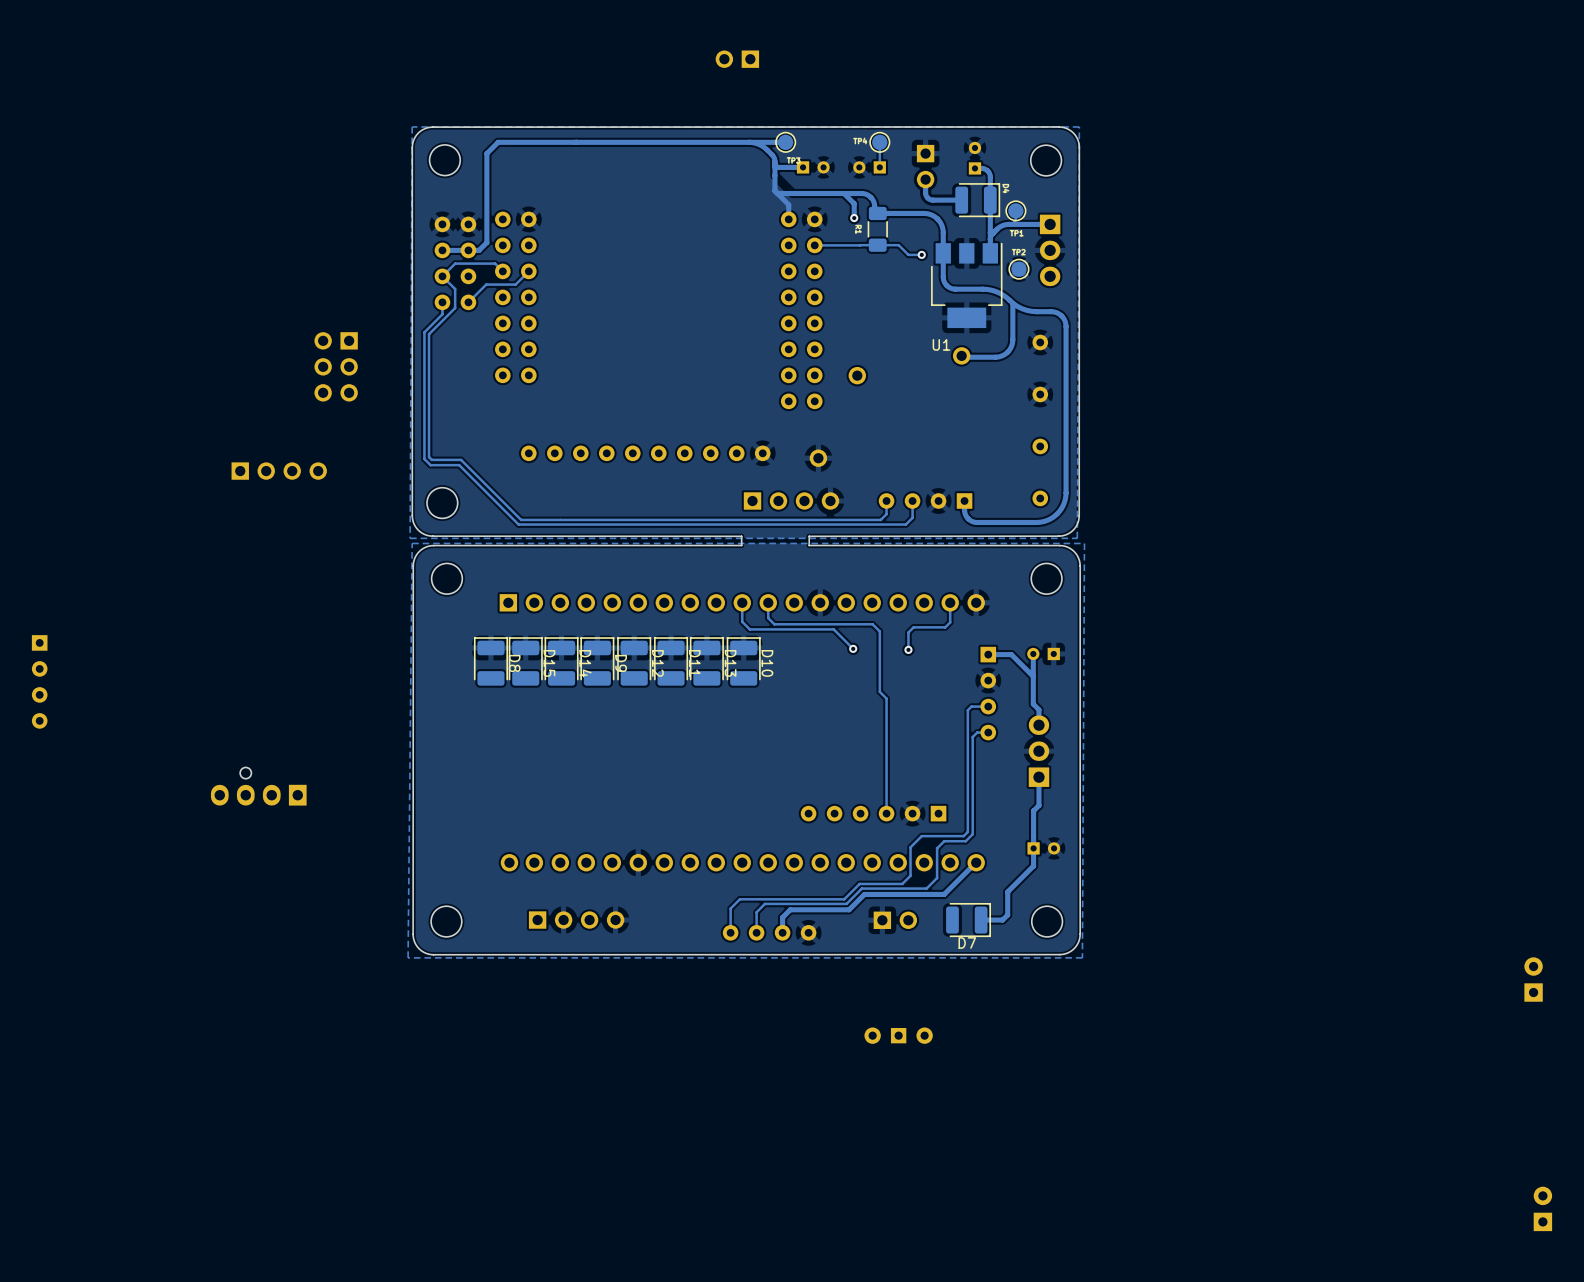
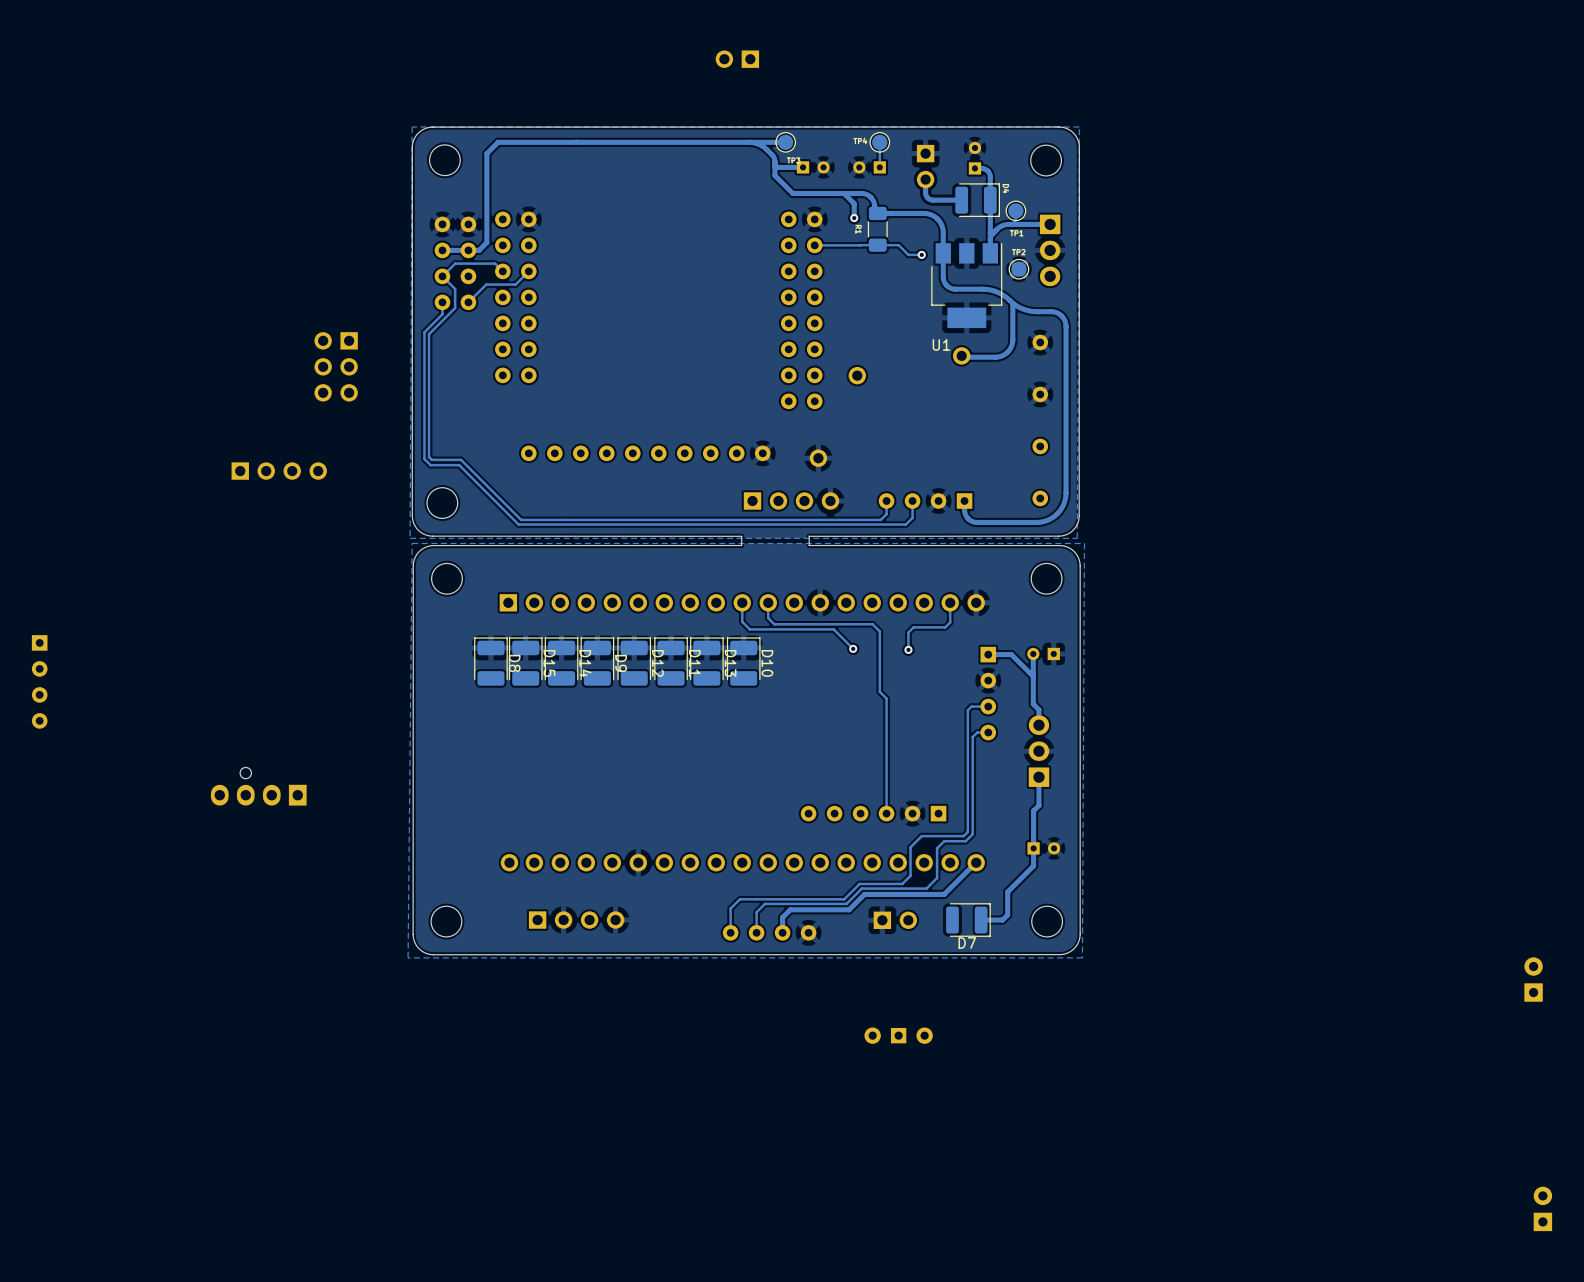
track: (774, 175) (774, 190) (788, 204) (788, 219) -> none
track: (792, 193) (777, 193) -> (792, 193) (774, 175)

